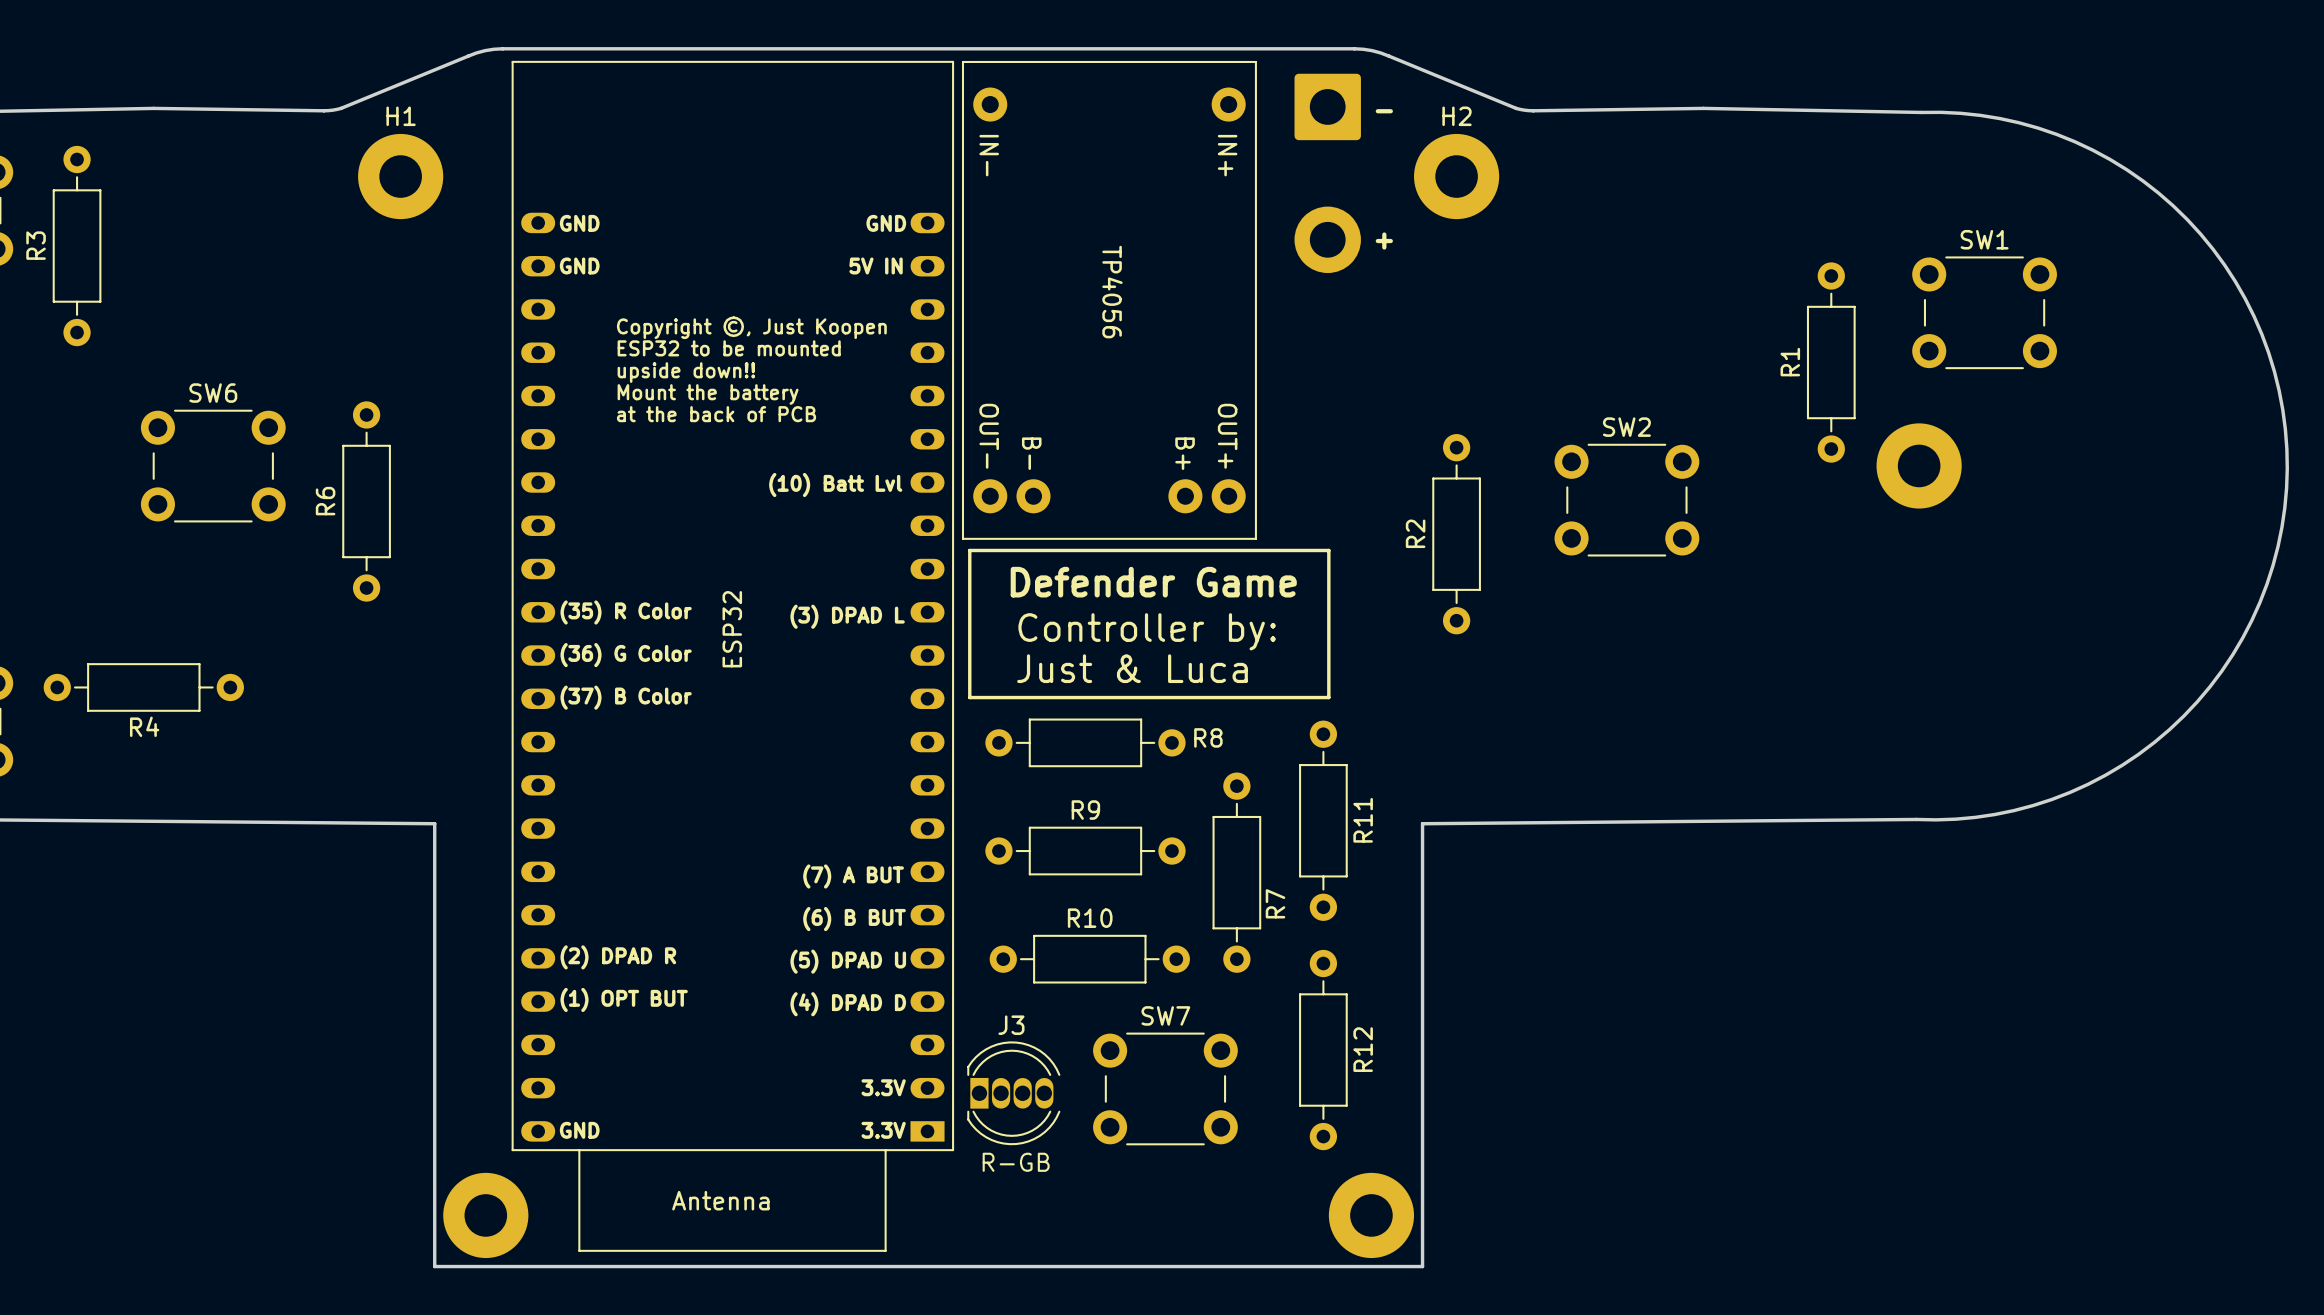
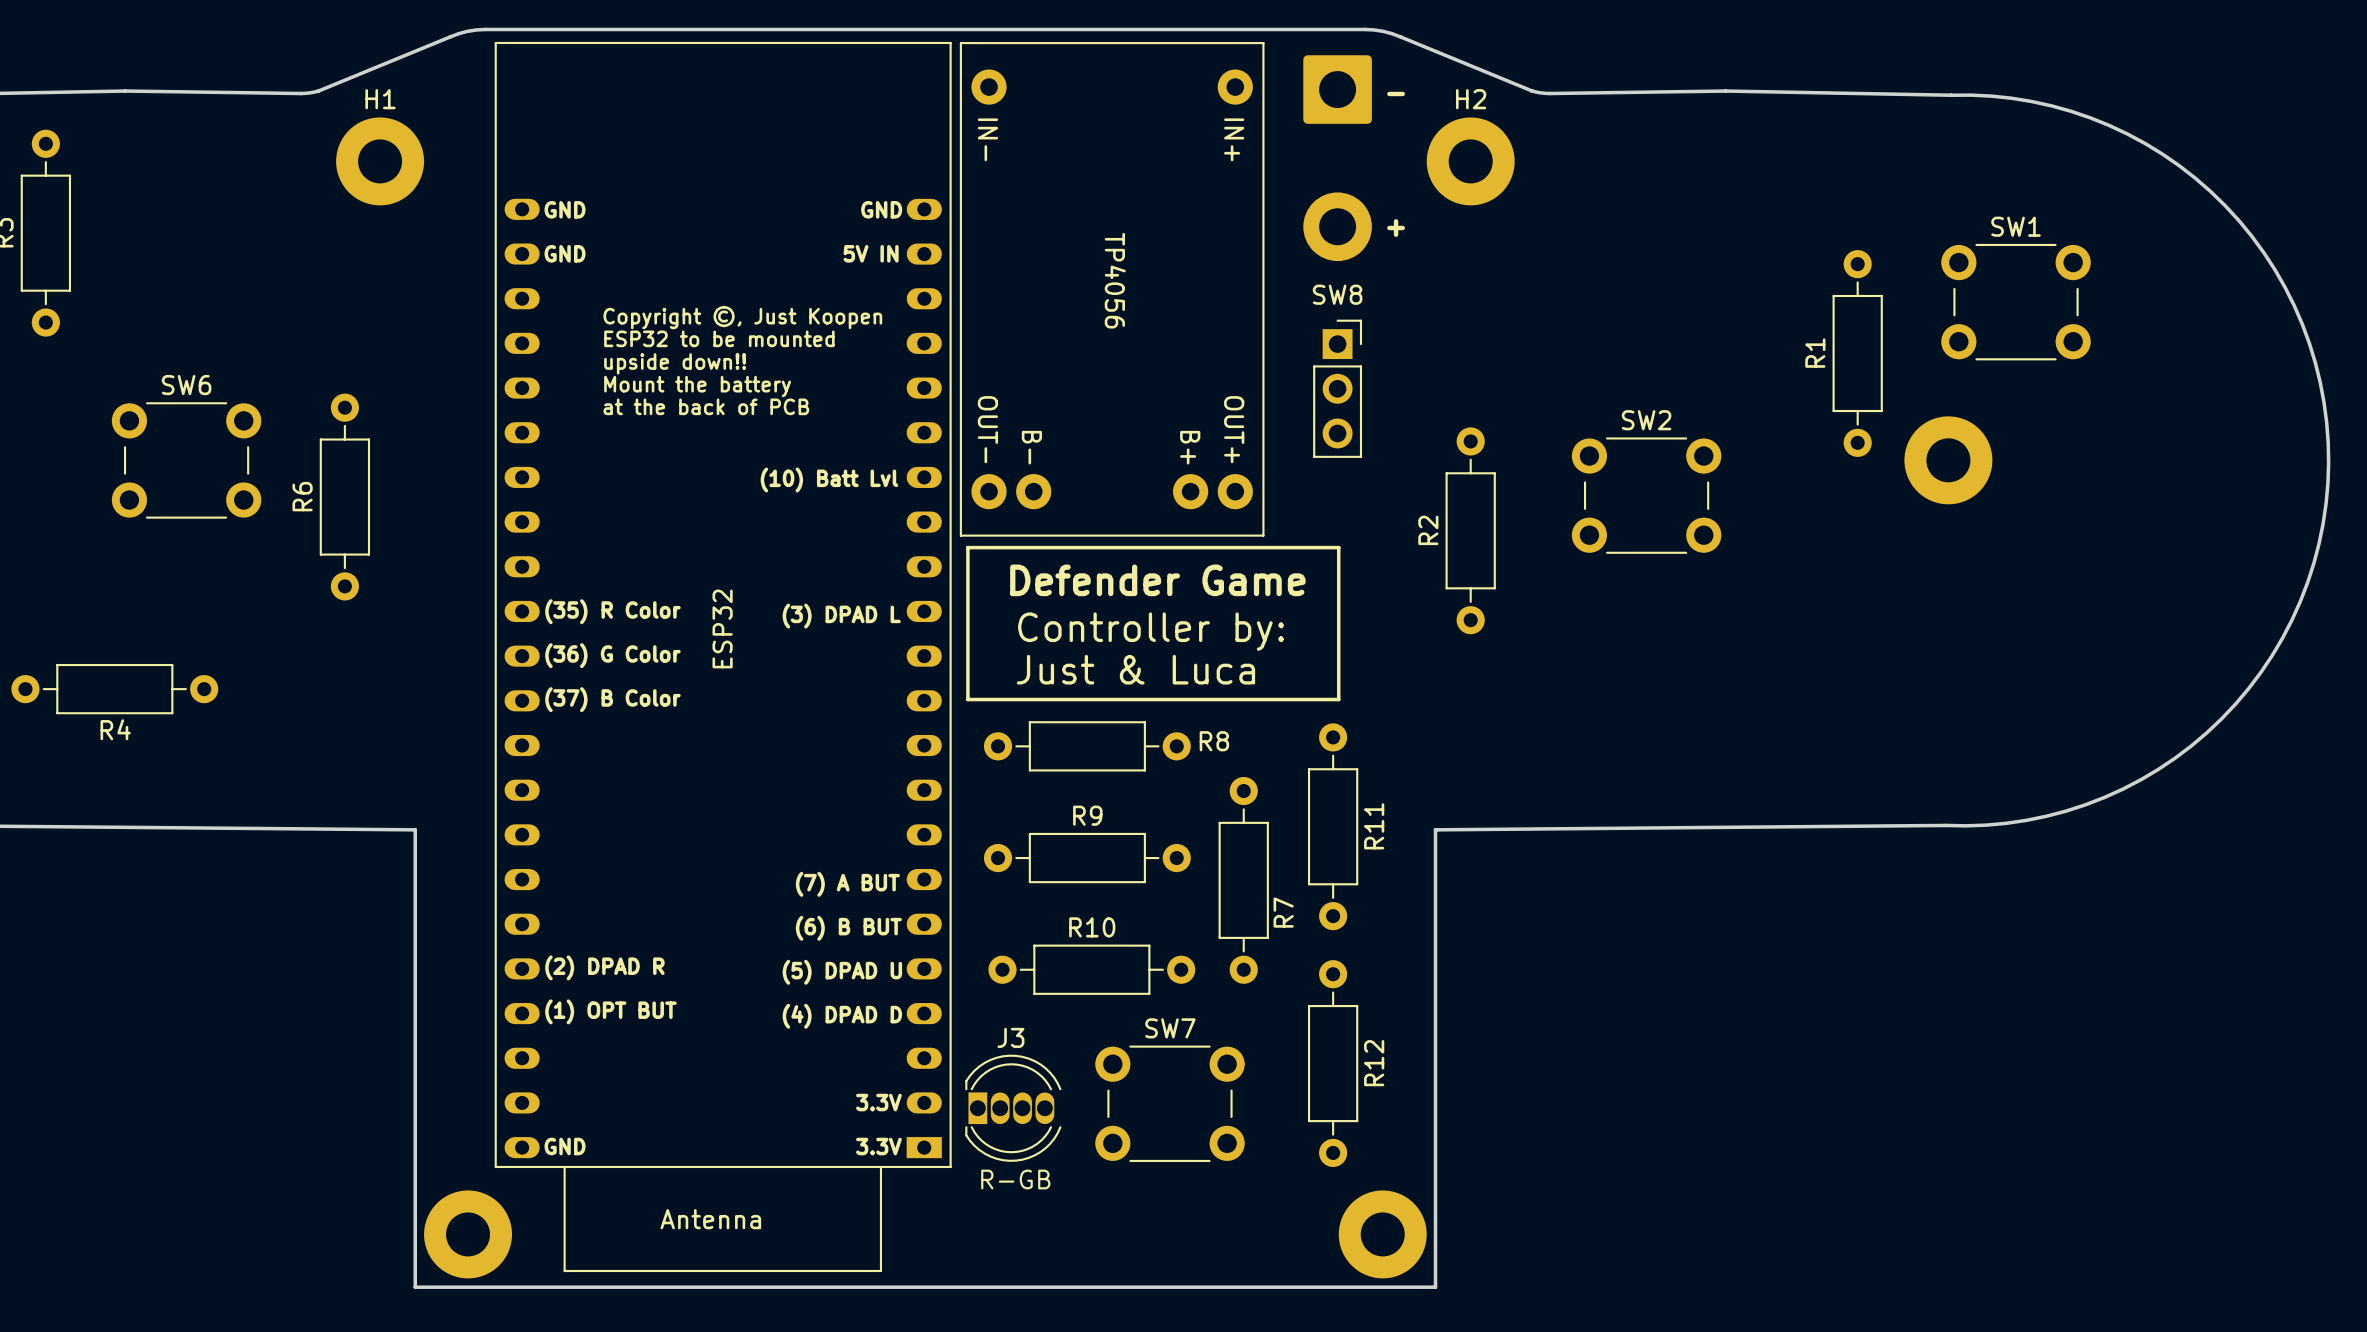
SW8: none -> (1337, 388)

